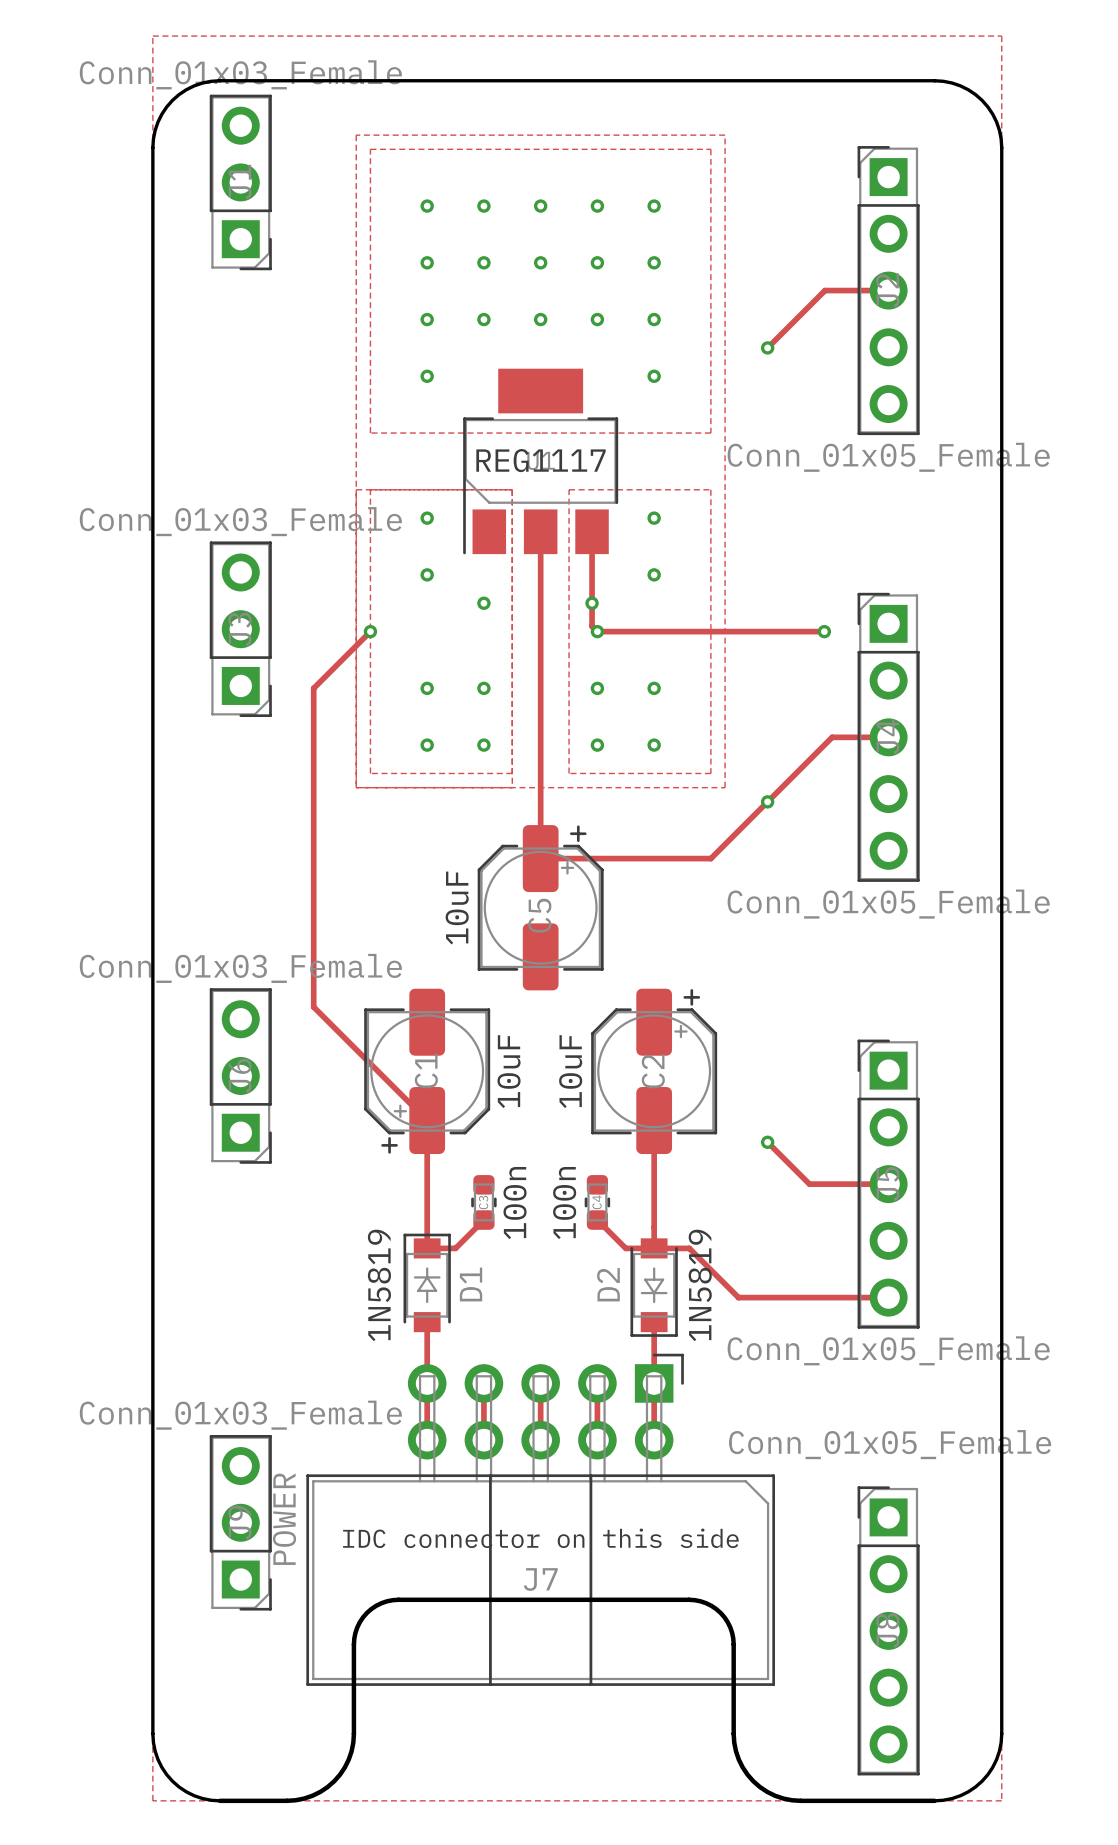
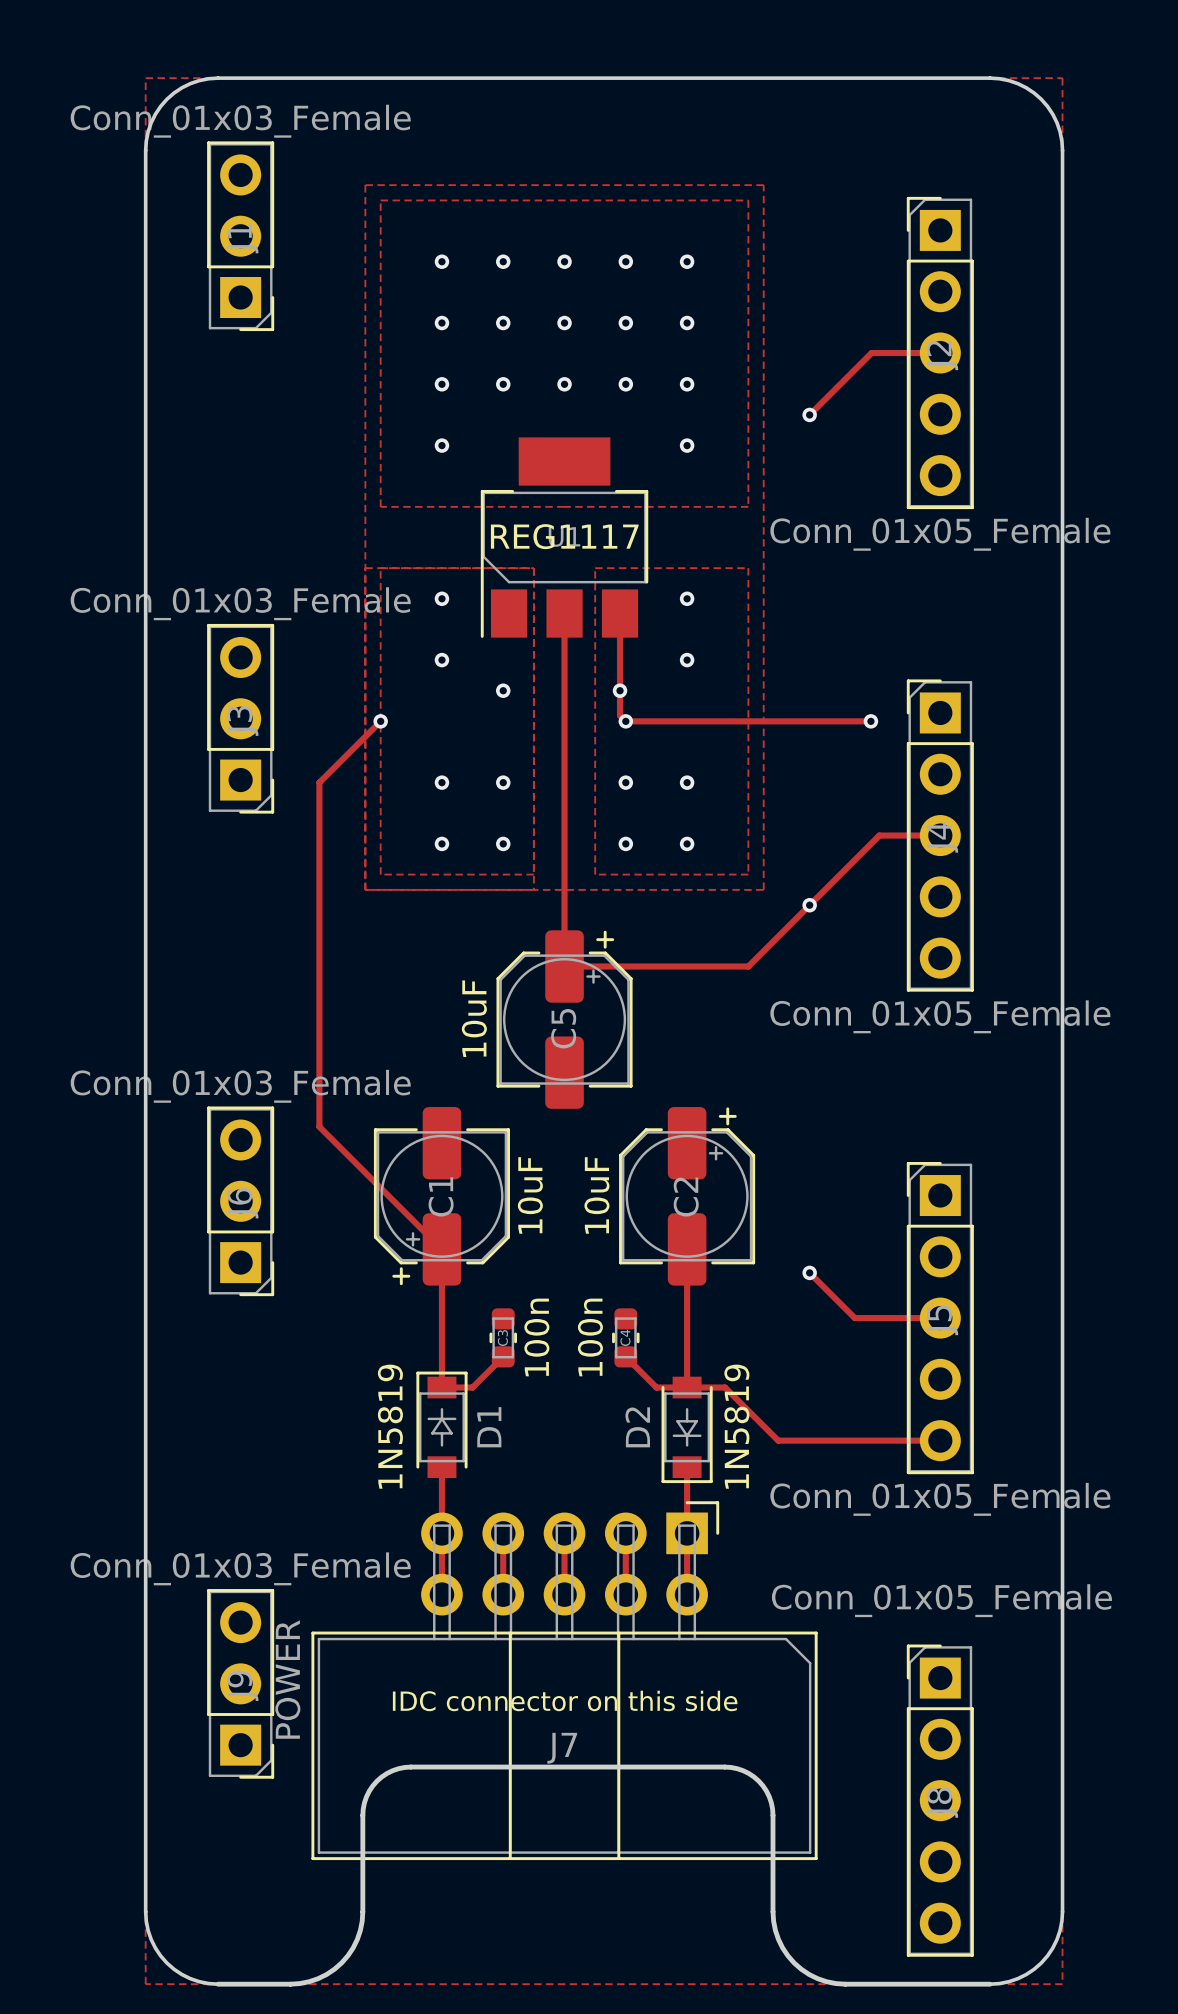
board edge: (152, 147) (157, 122) (172, 100) (194, 85) (219, 80) (943, 81) (968, 89) (982, 100) (996, 122) (1001, 147) -> (145, 198) (146, 141) (155, 114) (166, 99) (181, 87) (199, 80) (218, 78) (999, 78) (1026, 87) (1041, 99) (1052, 114) (1061, 141) (1062, 198)

